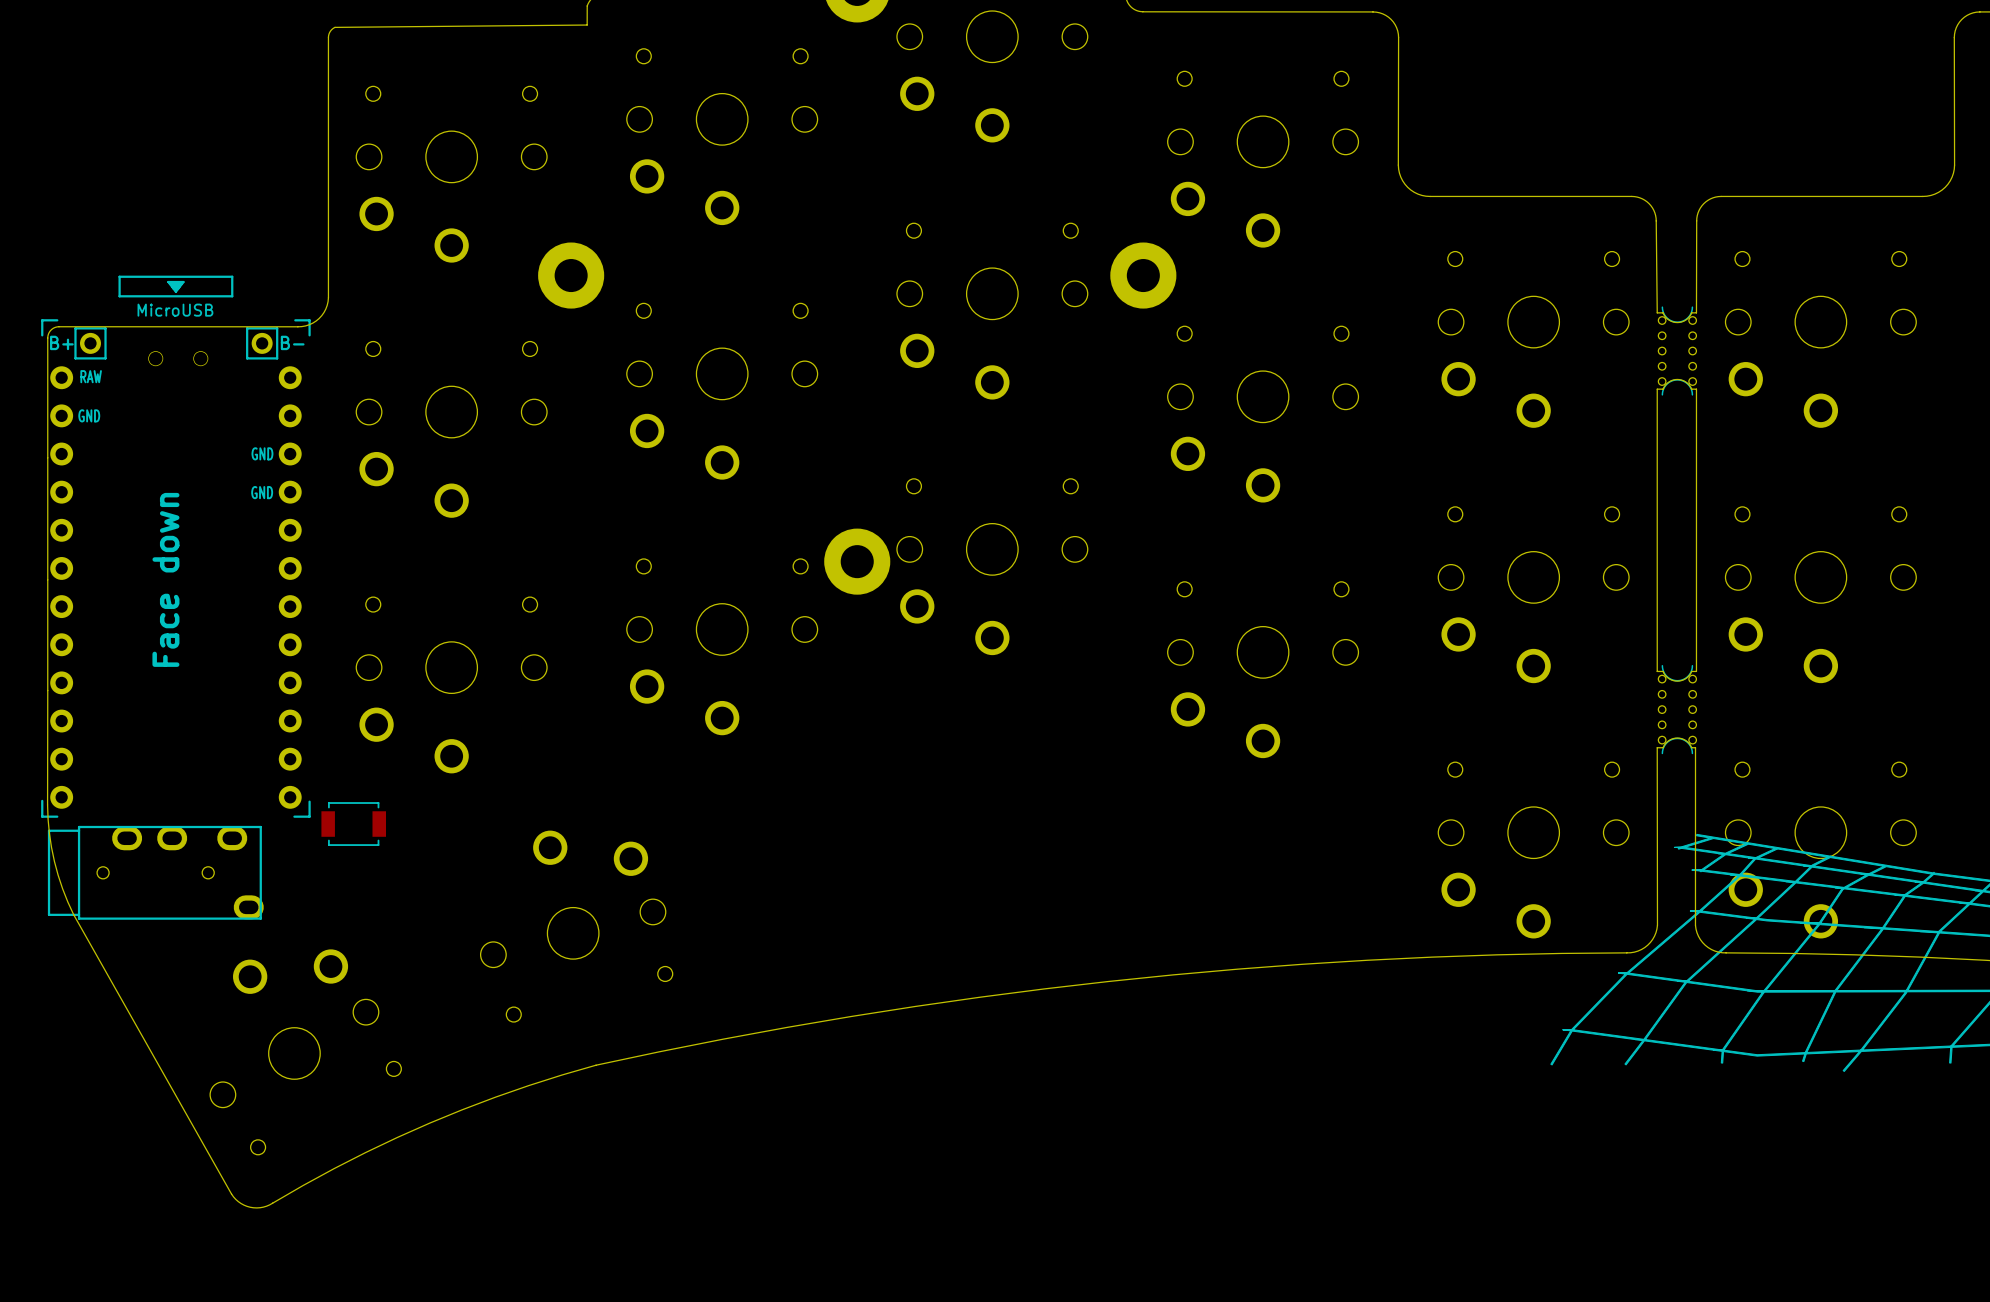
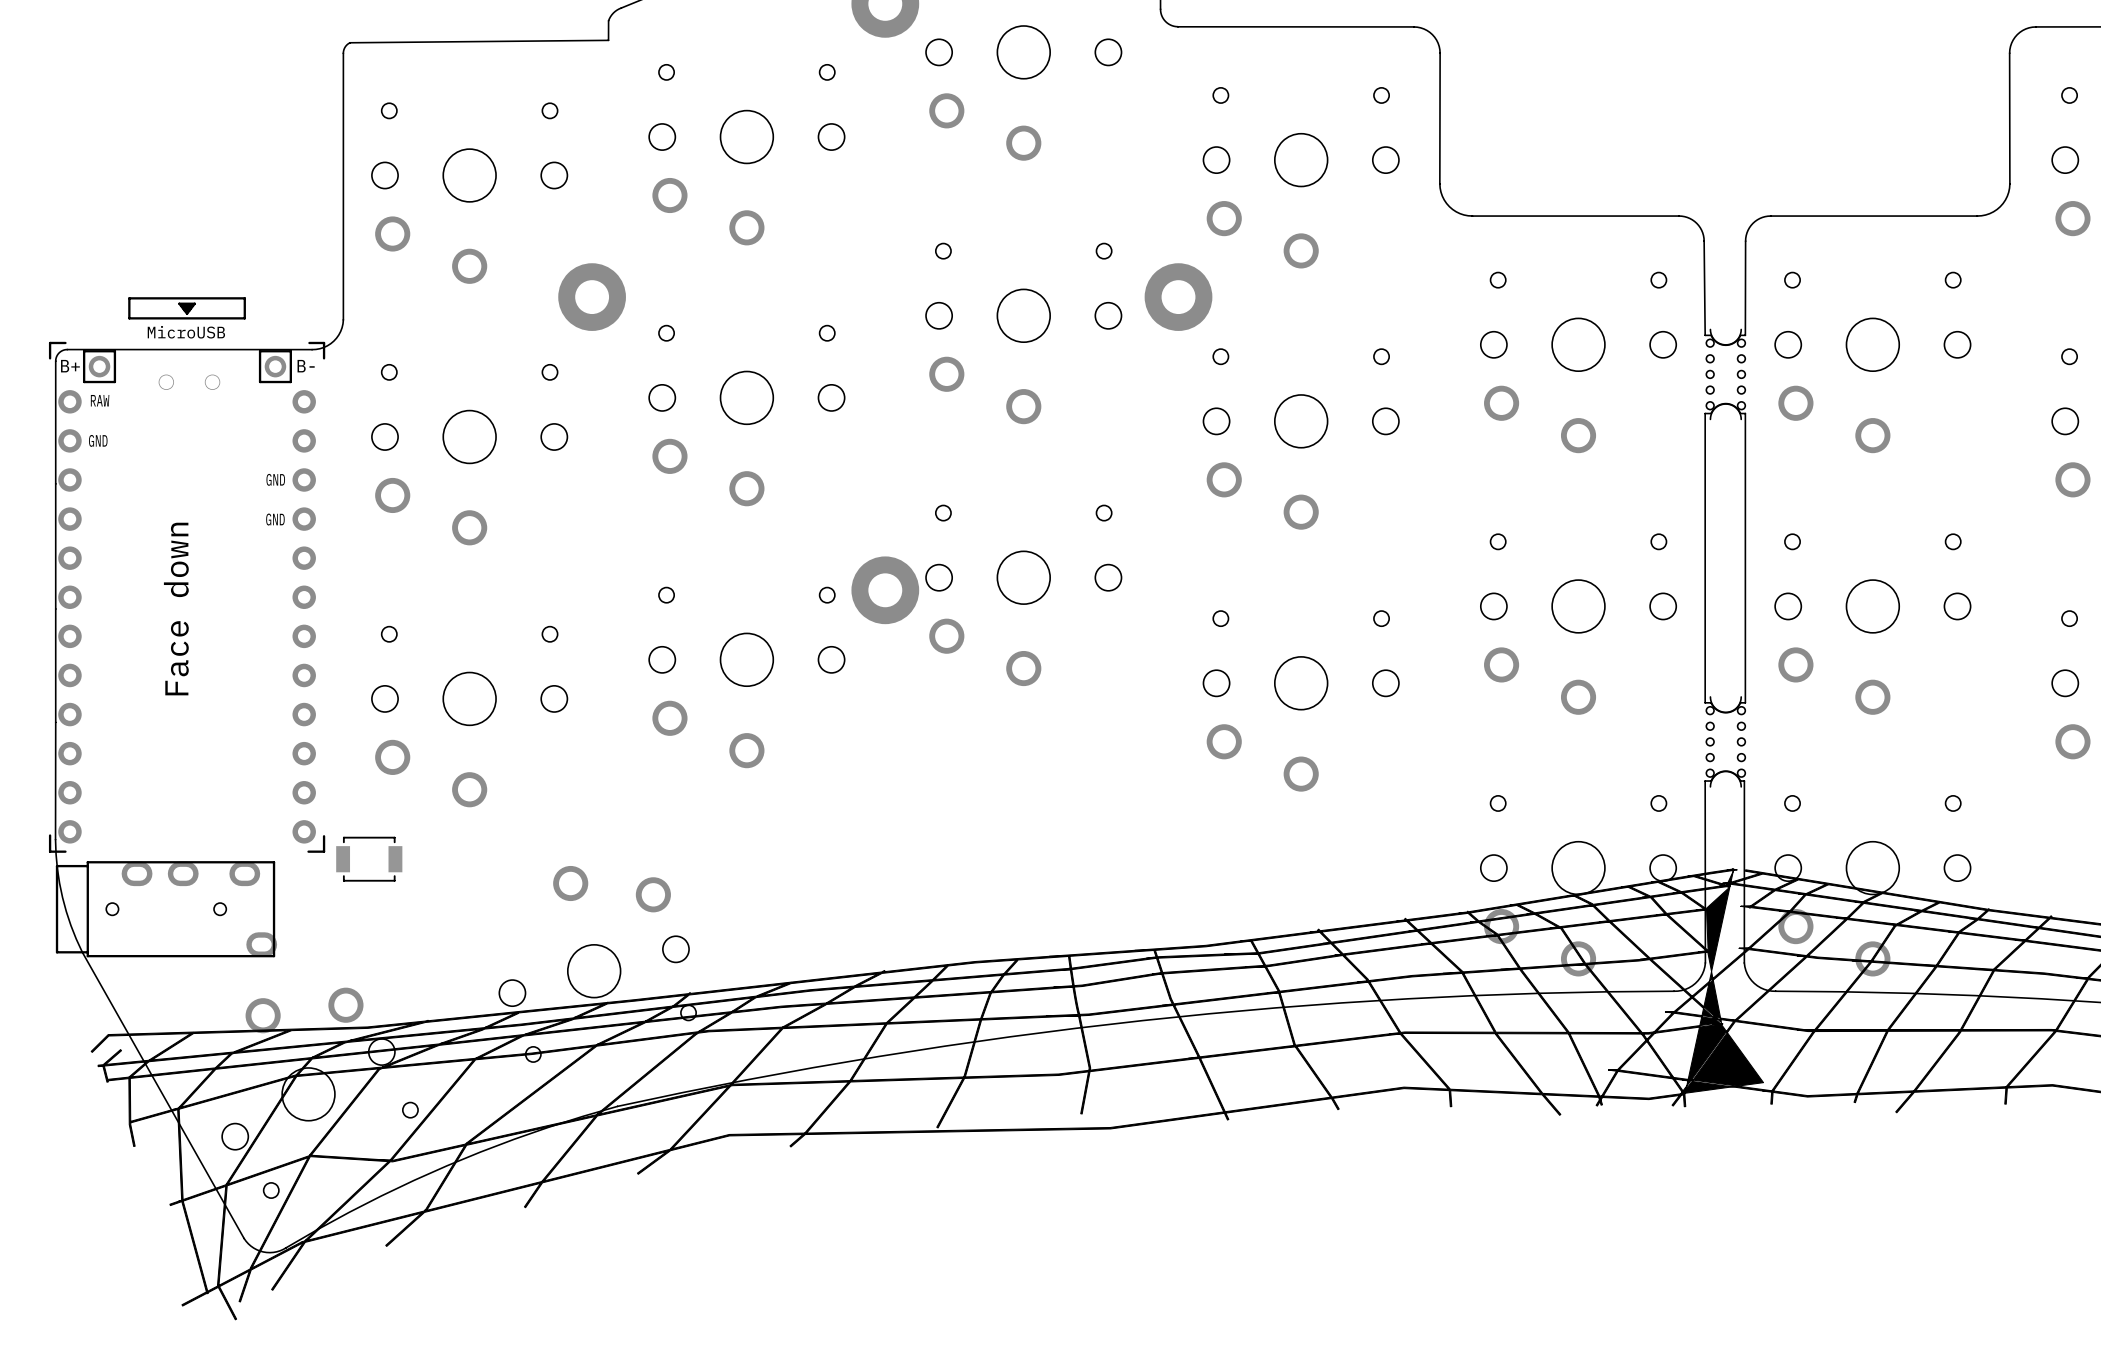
drawing: none -> [90, 868, 1765, 1321]

